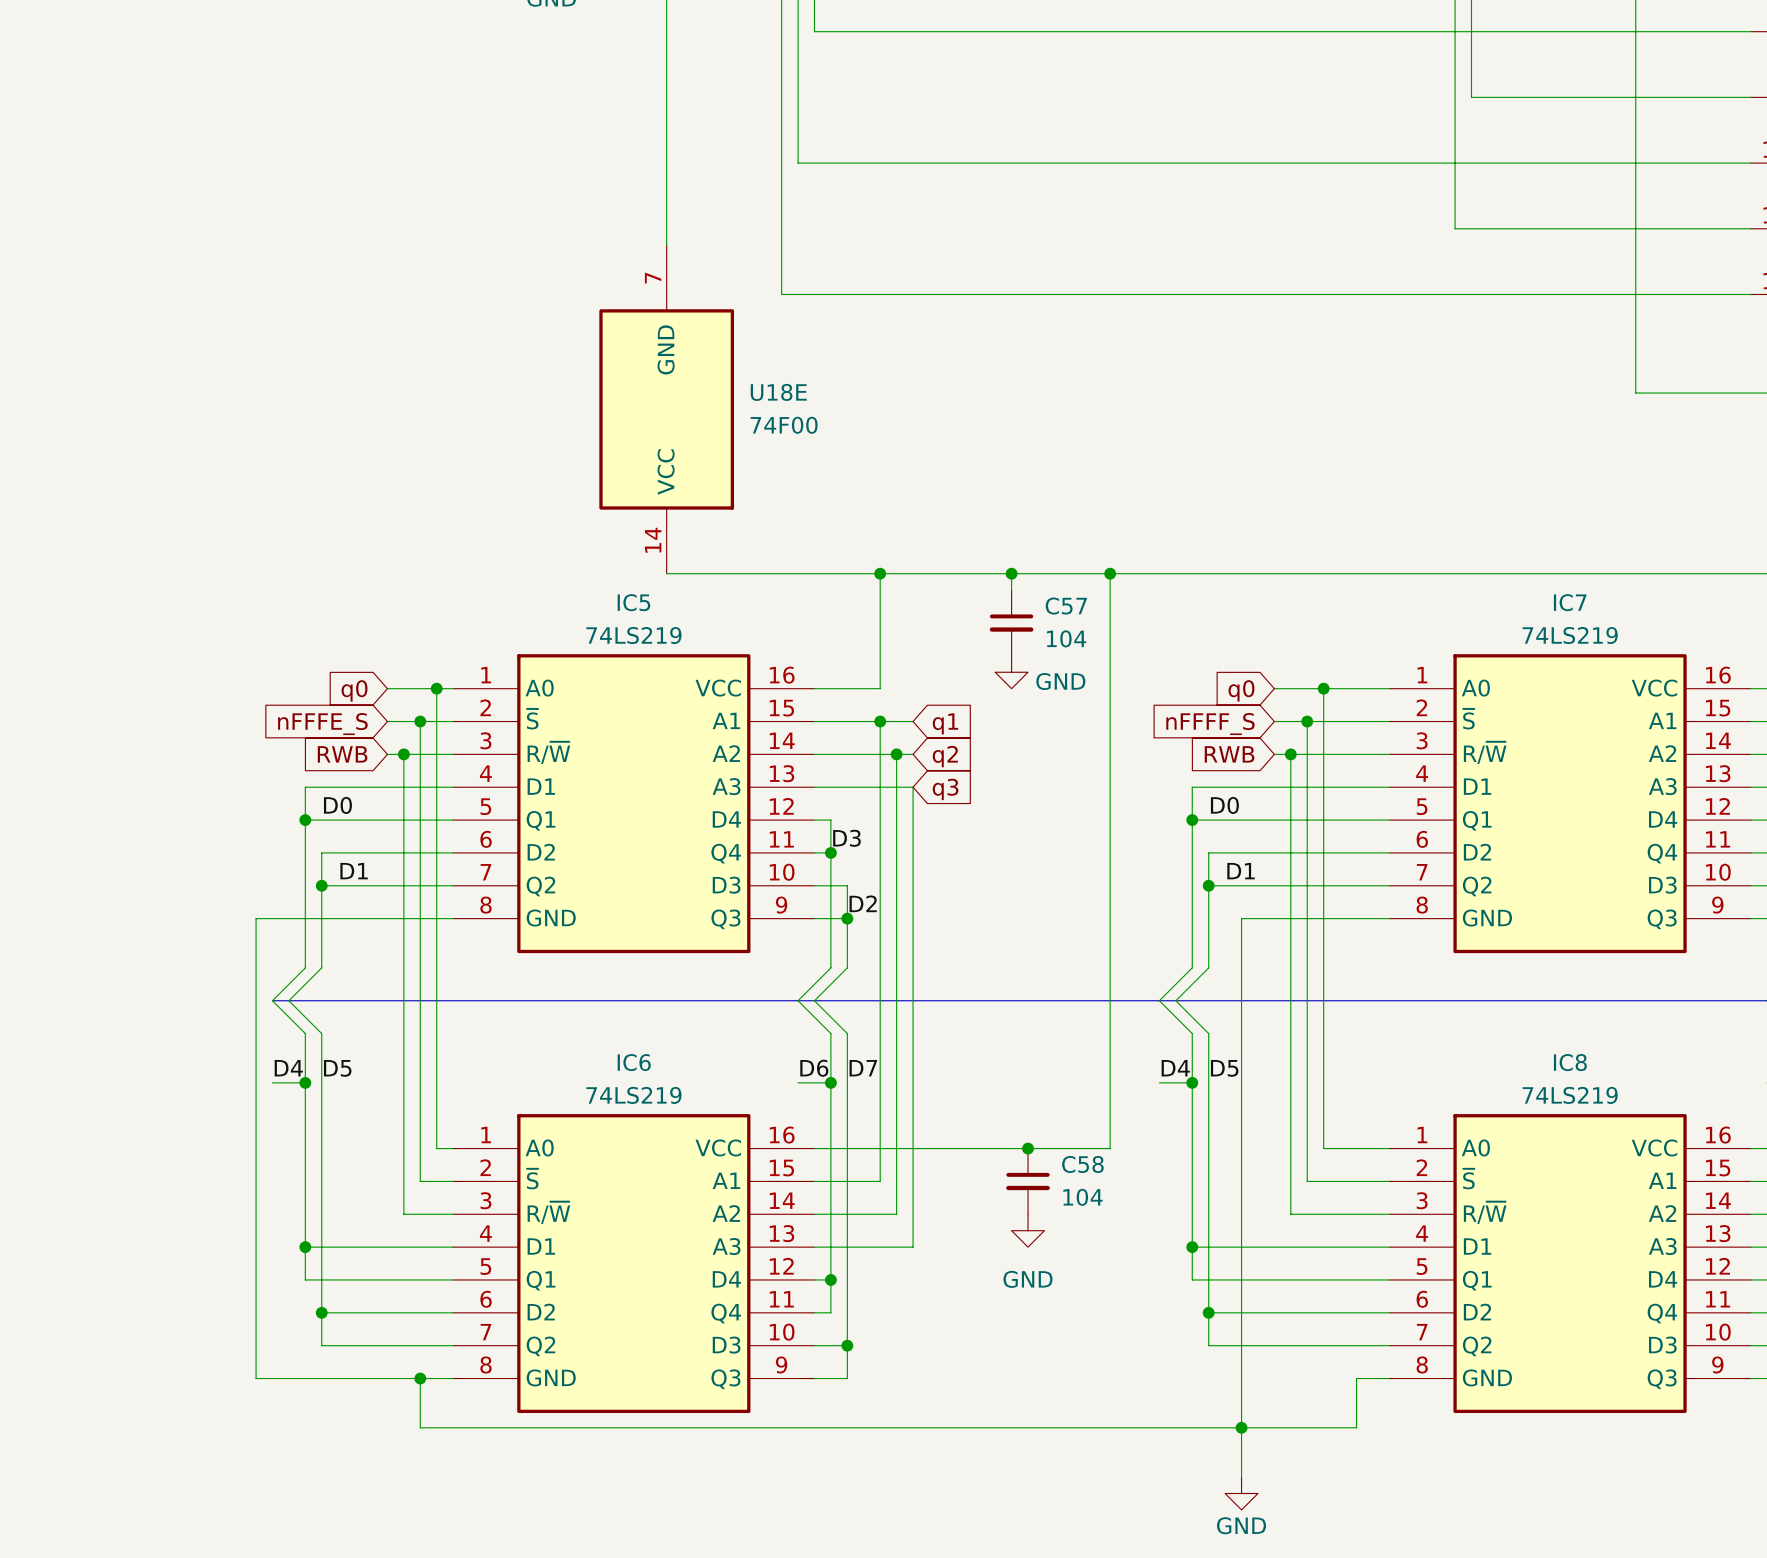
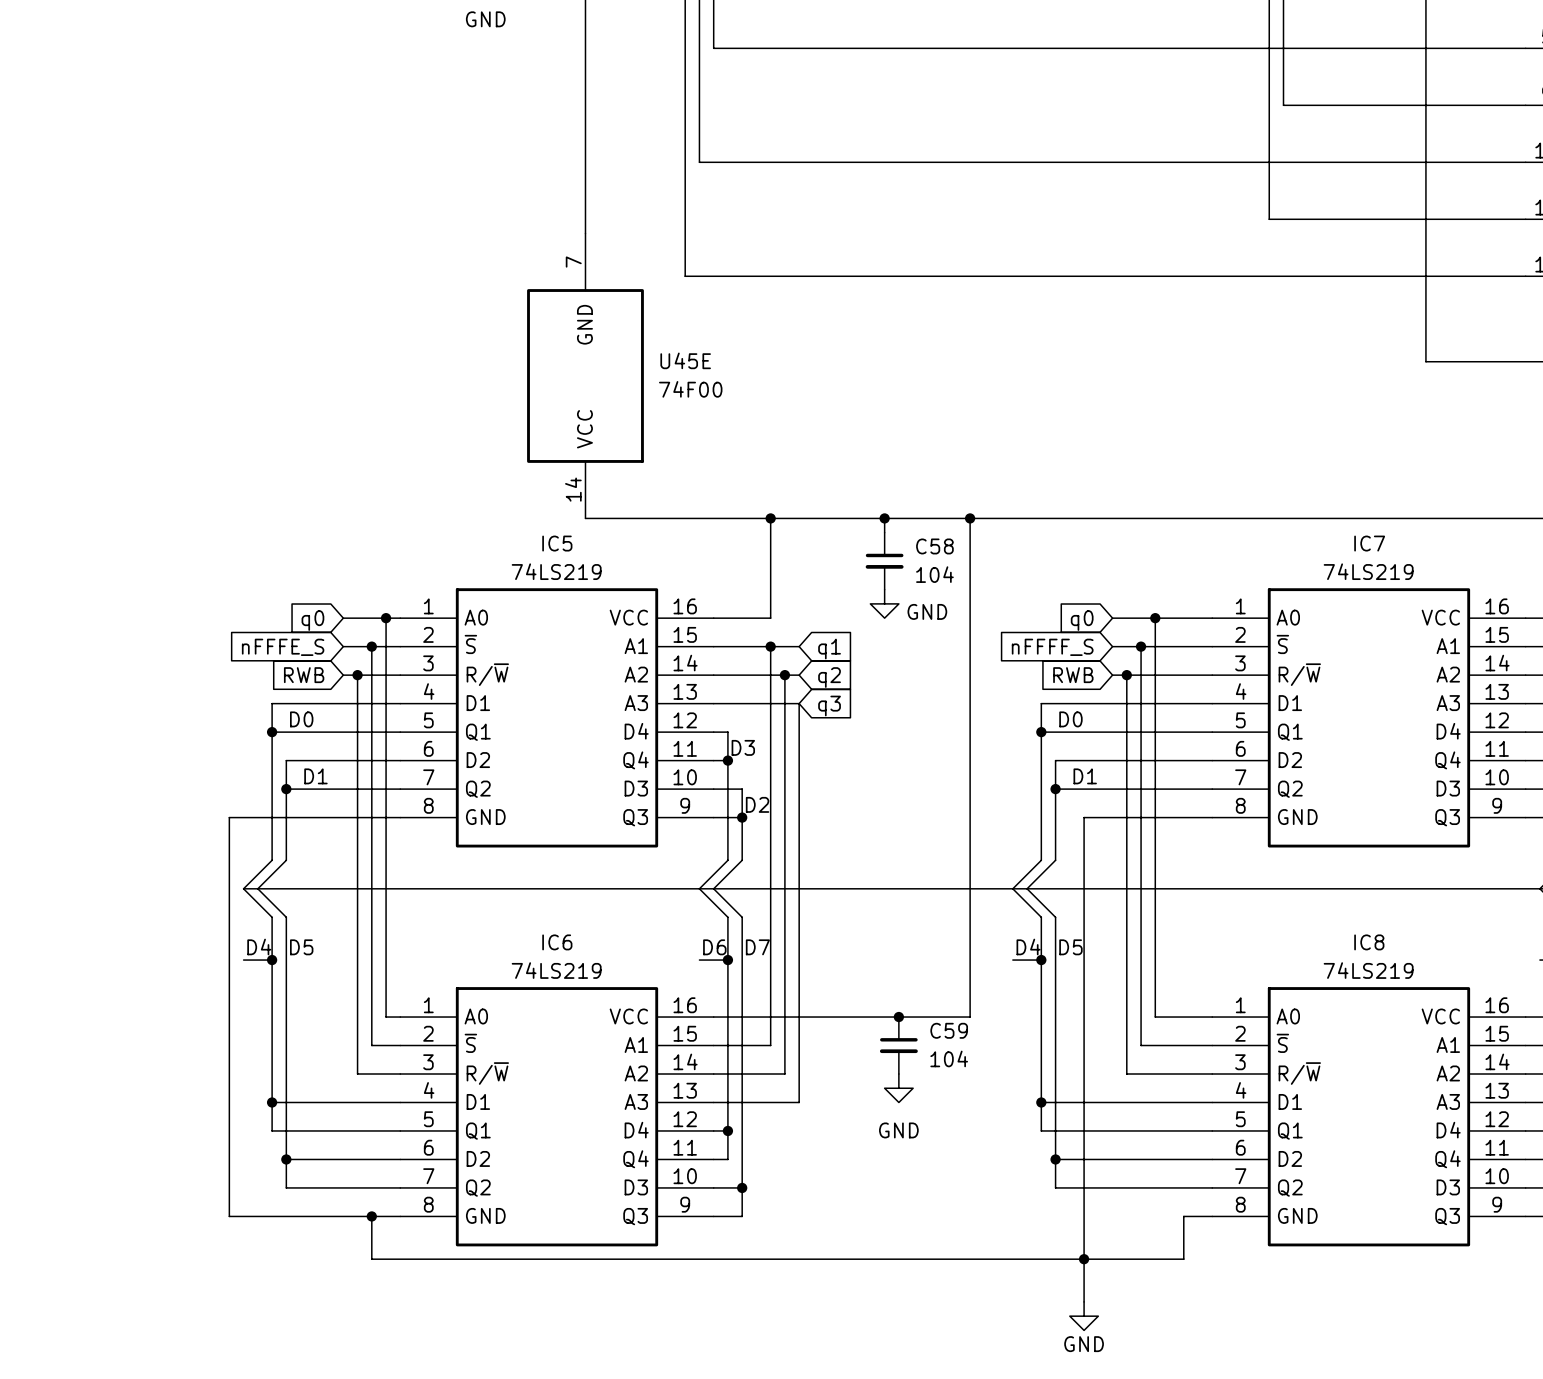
U18E name: U18E (778, 392) -> U45E (685, 360)
C57 name: C57 (1066, 606) -> C58 (934, 546)
C58 name: C58 (1082, 1164) -> C59 (949, 1030)

